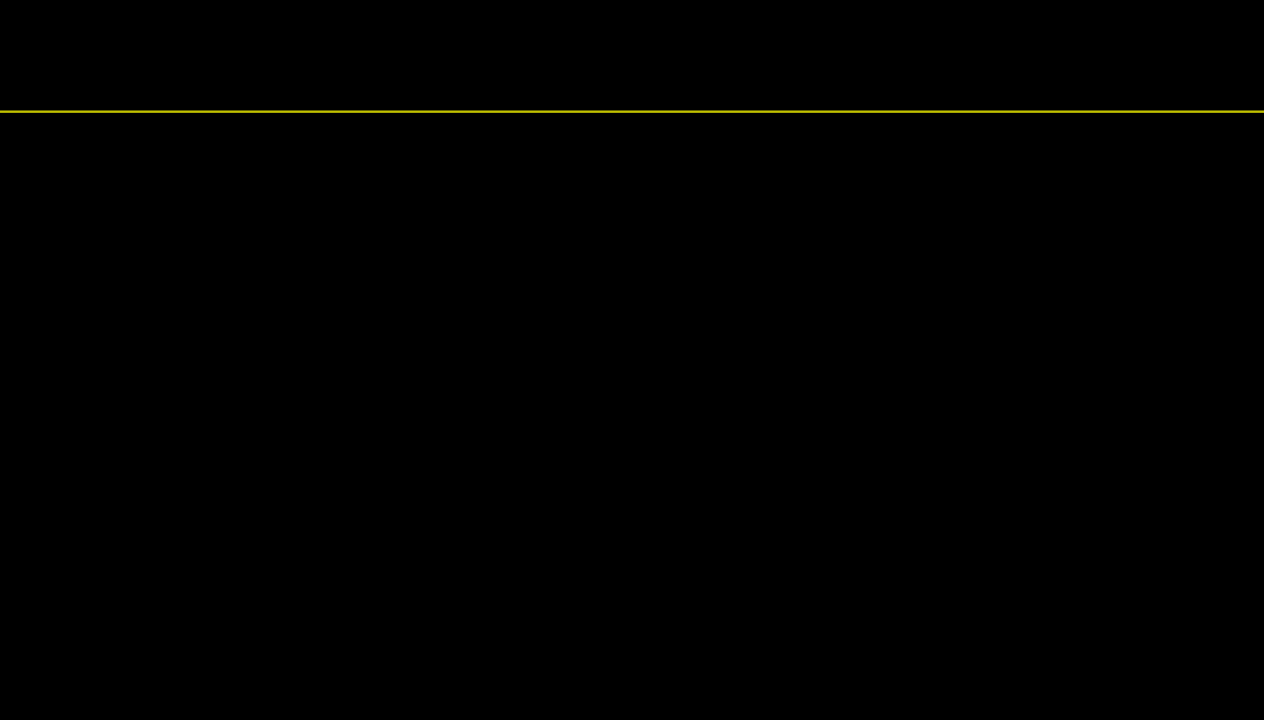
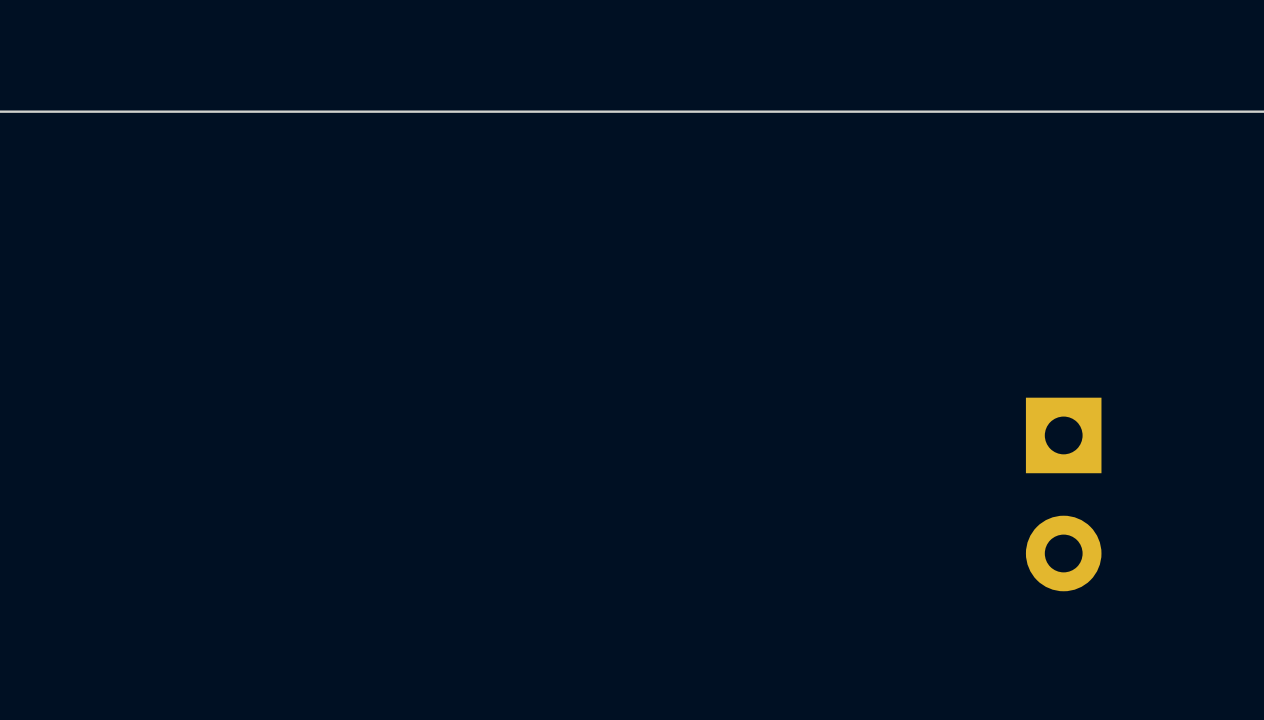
part: none -> (1063, 494)

